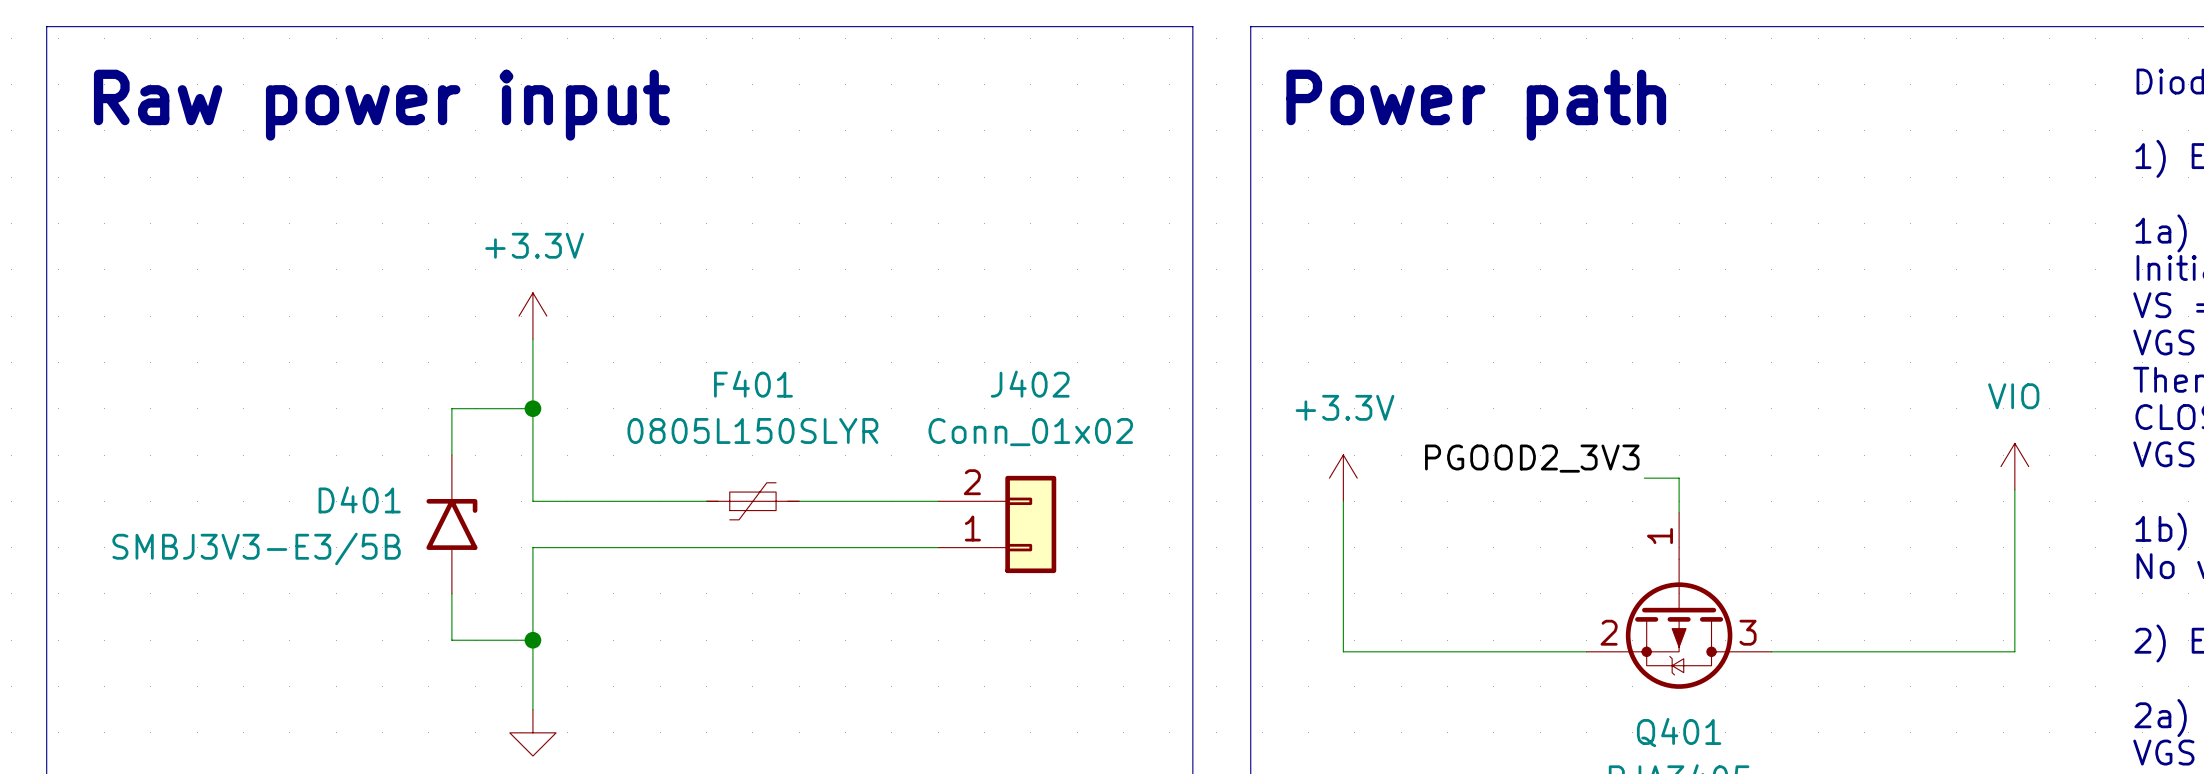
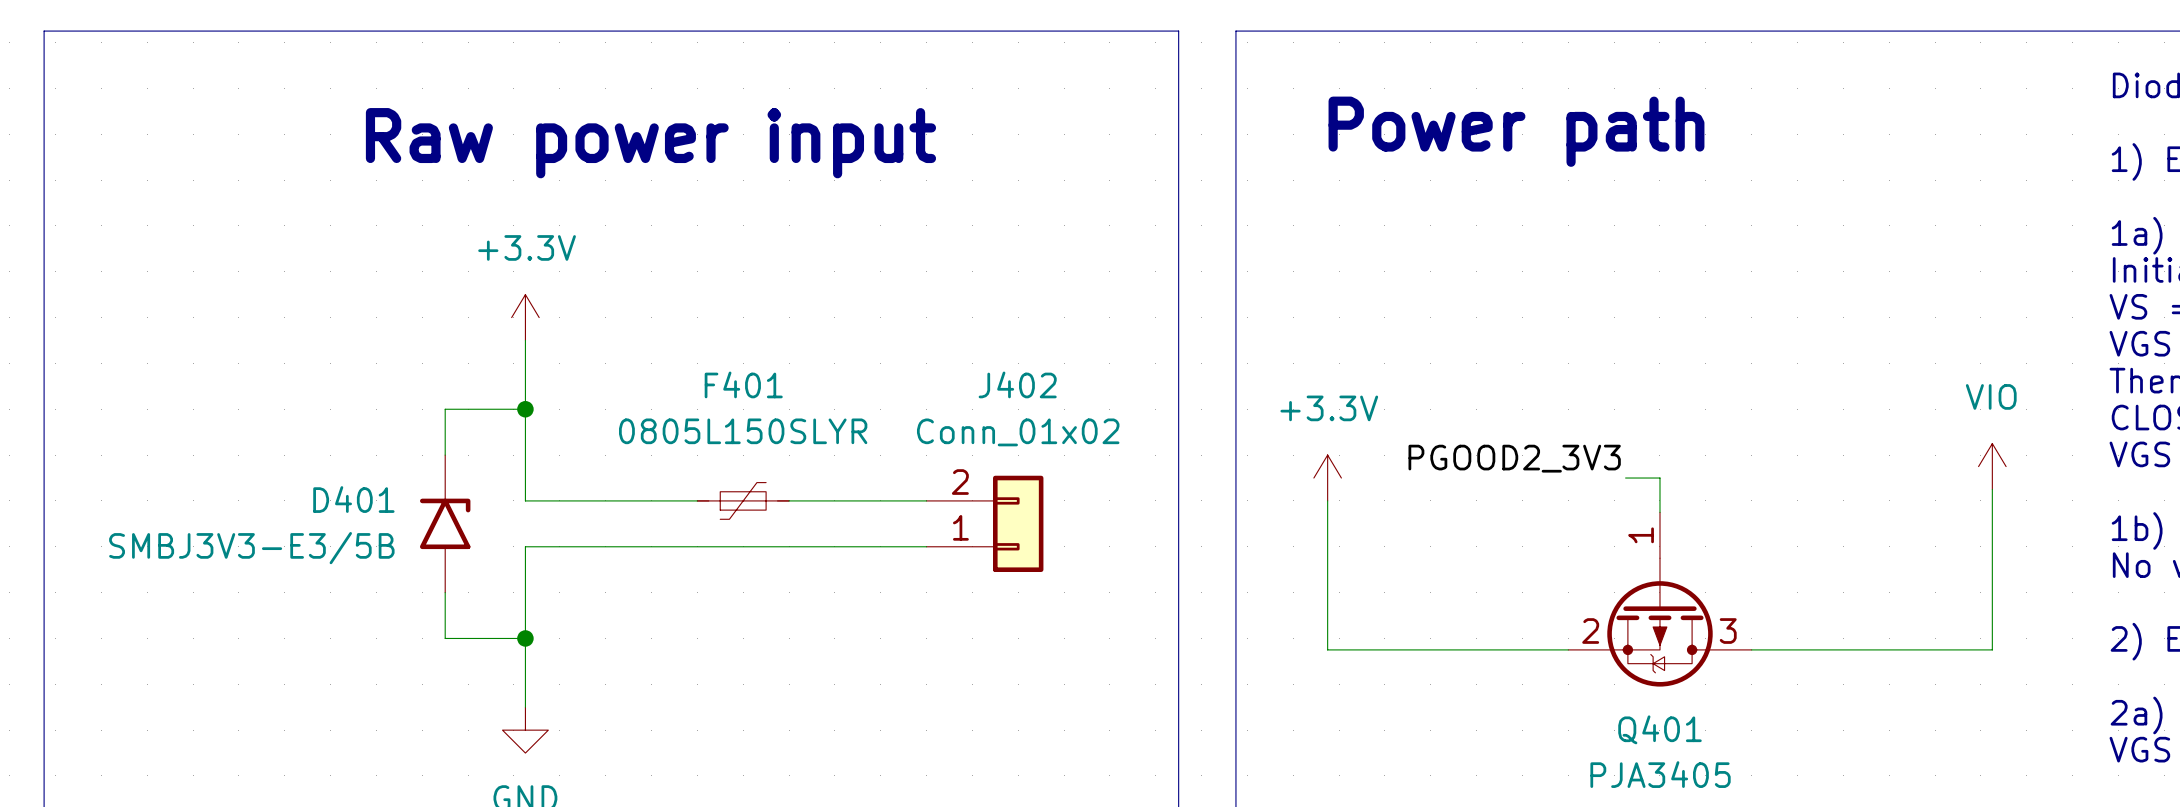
text position: Raw power input (381, 105) -> Raw power input (650, 143)
text position: Power path (1476, 105) -> Power path (1516, 131)

